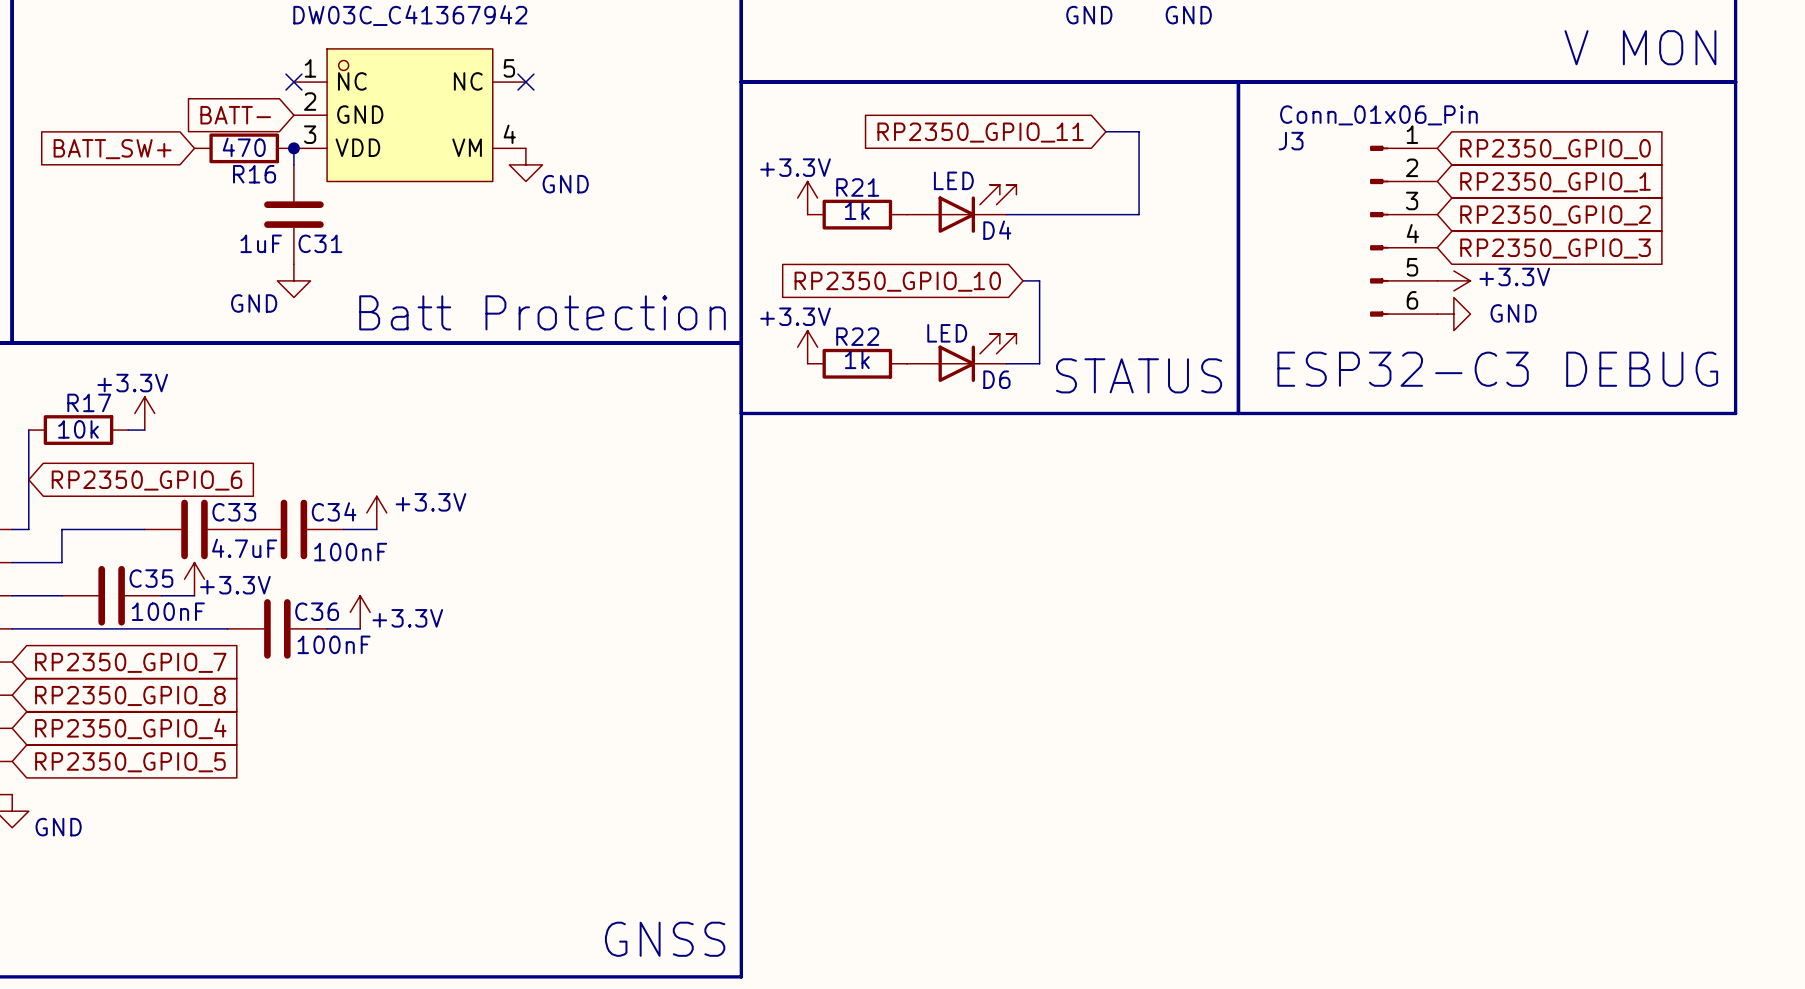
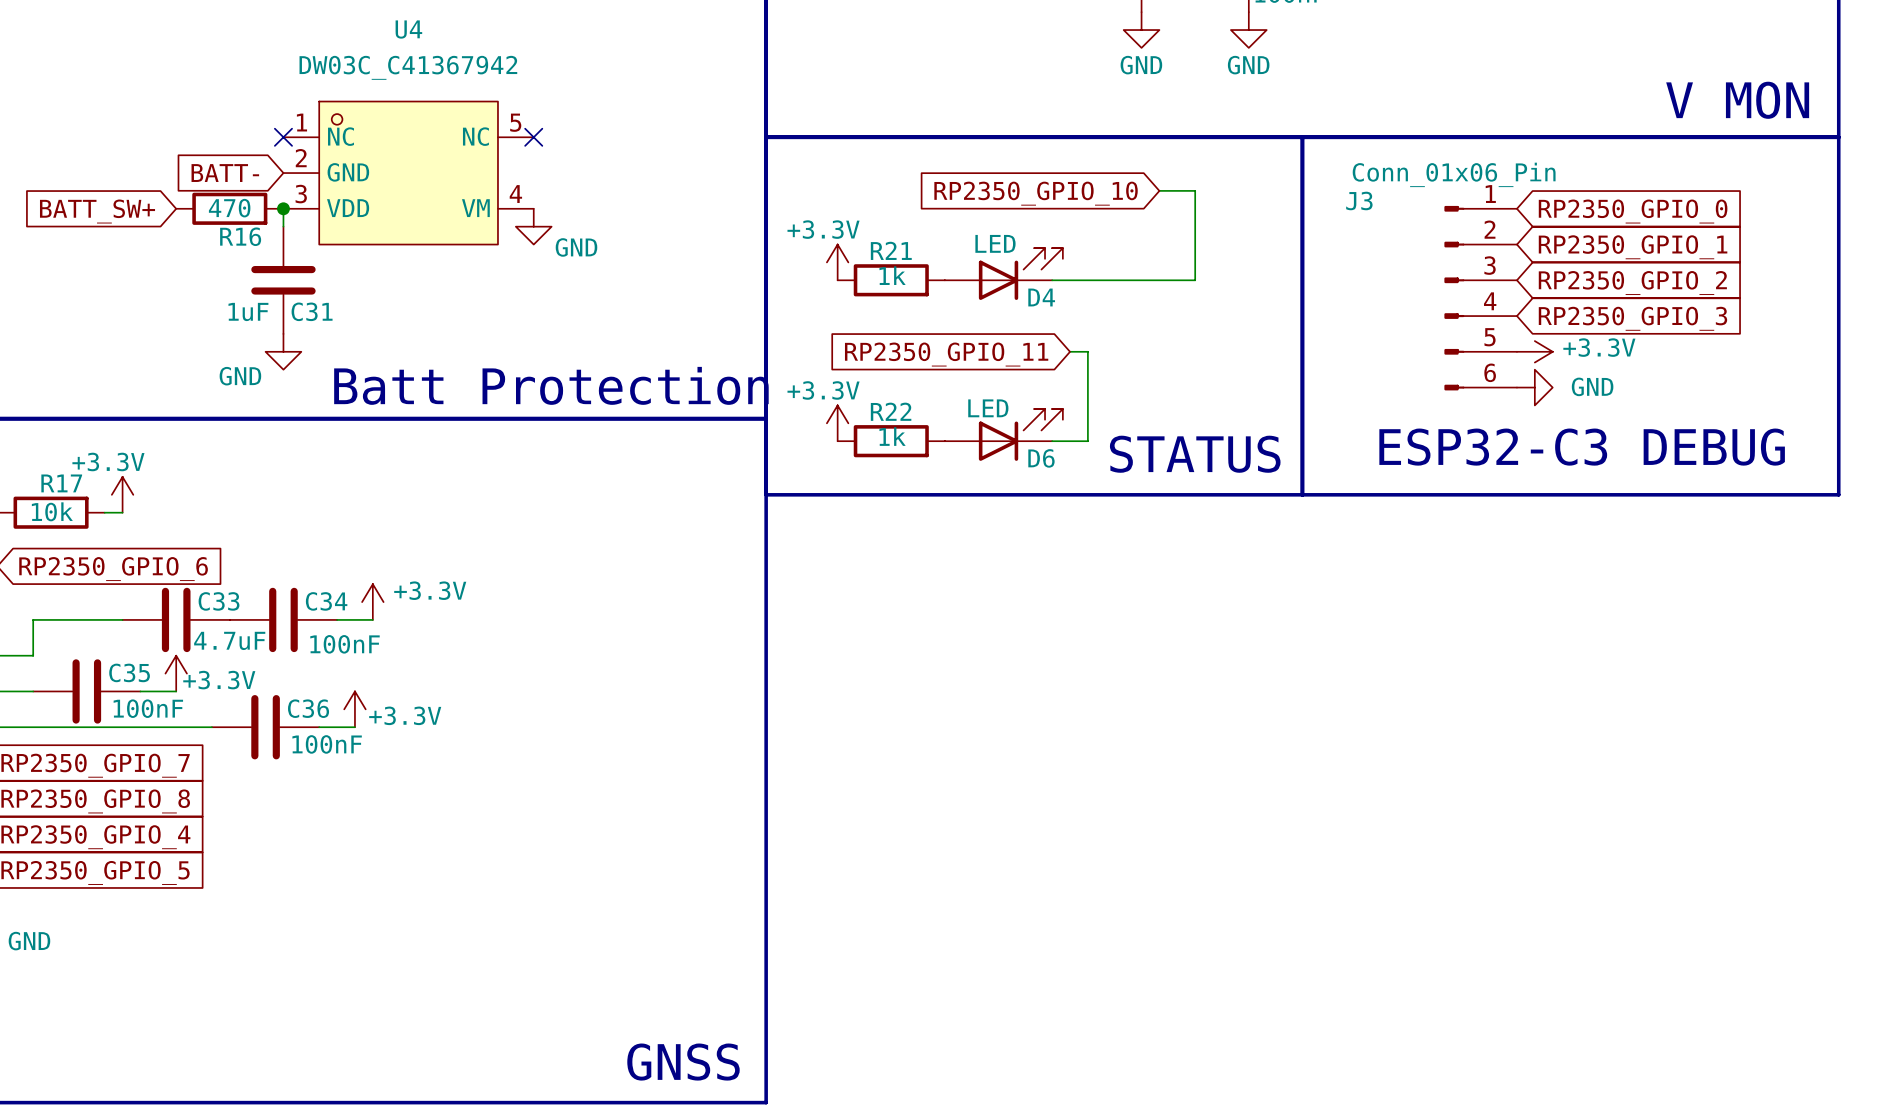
global label: RP2350_GPIO_11 (980, 132) -> RP2350_GPIO_10 (1036, 193)
global label: RP2350_GPIO_10 (897, 281) -> RP2350_GPIO_11 (946, 354)

